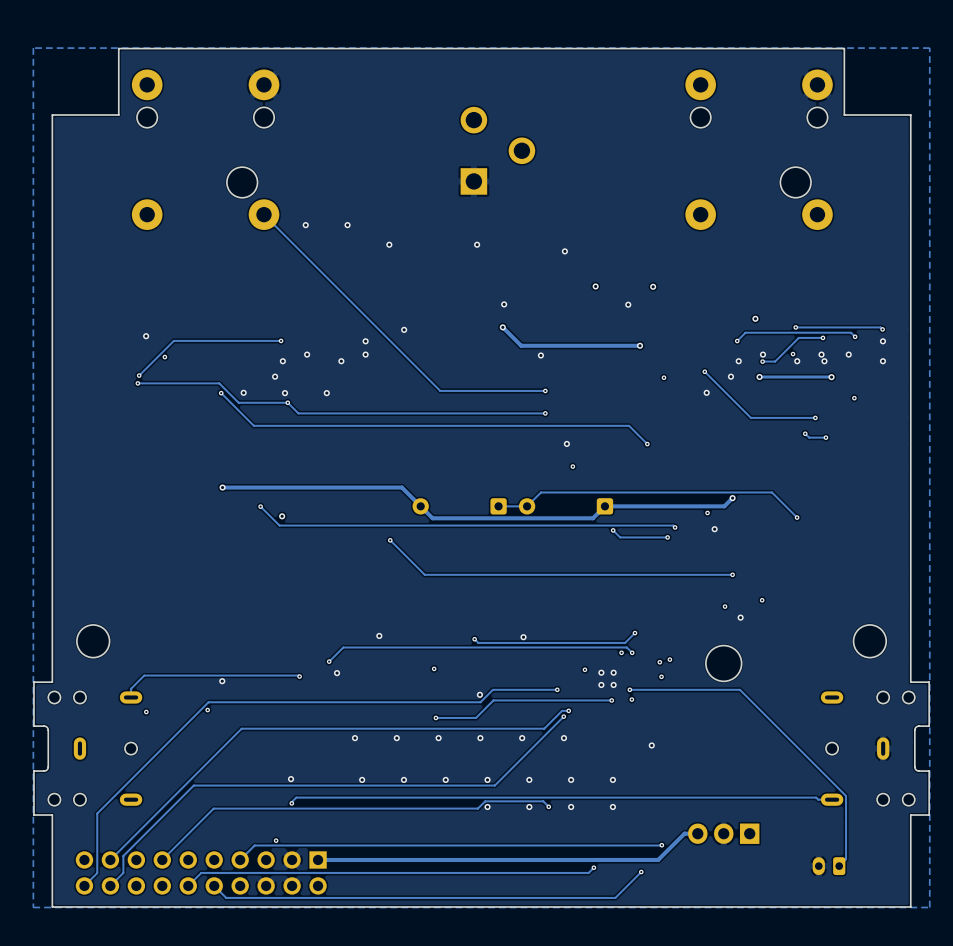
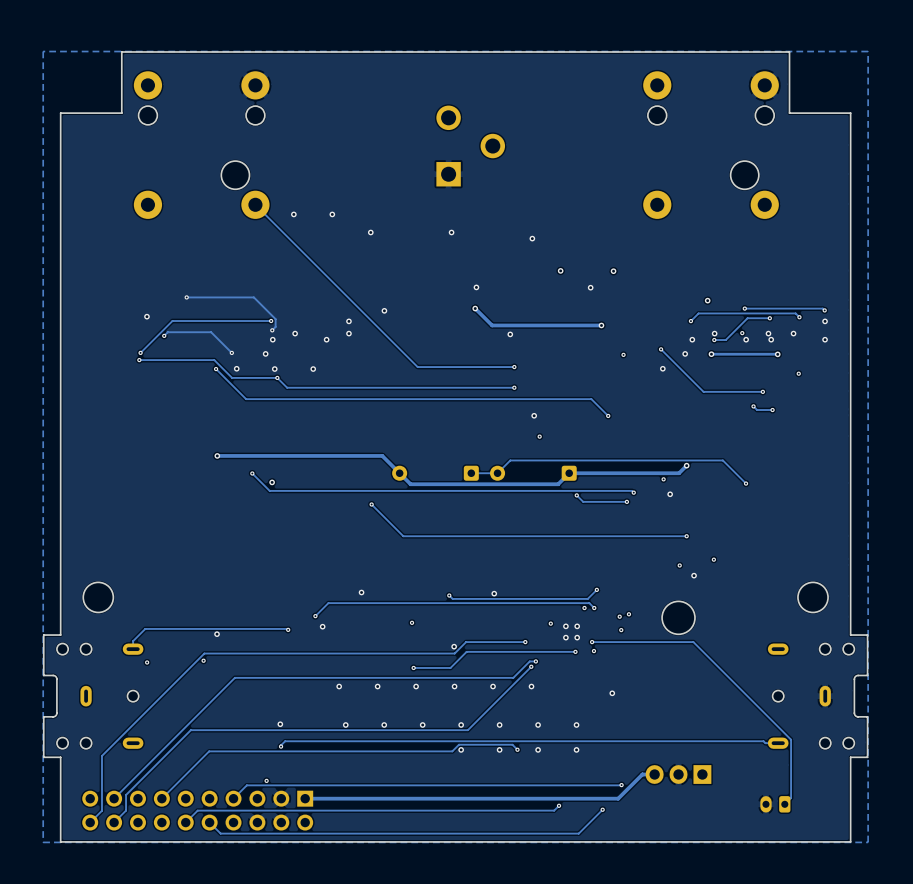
track: none -> (186, 297) (253, 297) (275, 319) (275, 326) (272, 330)
via: none -> (186, 297)
via: none -> (272, 330)
track: none -> (164, 335) (167, 332) (211, 332) (231, 352)
via: none -> (231, 352)

